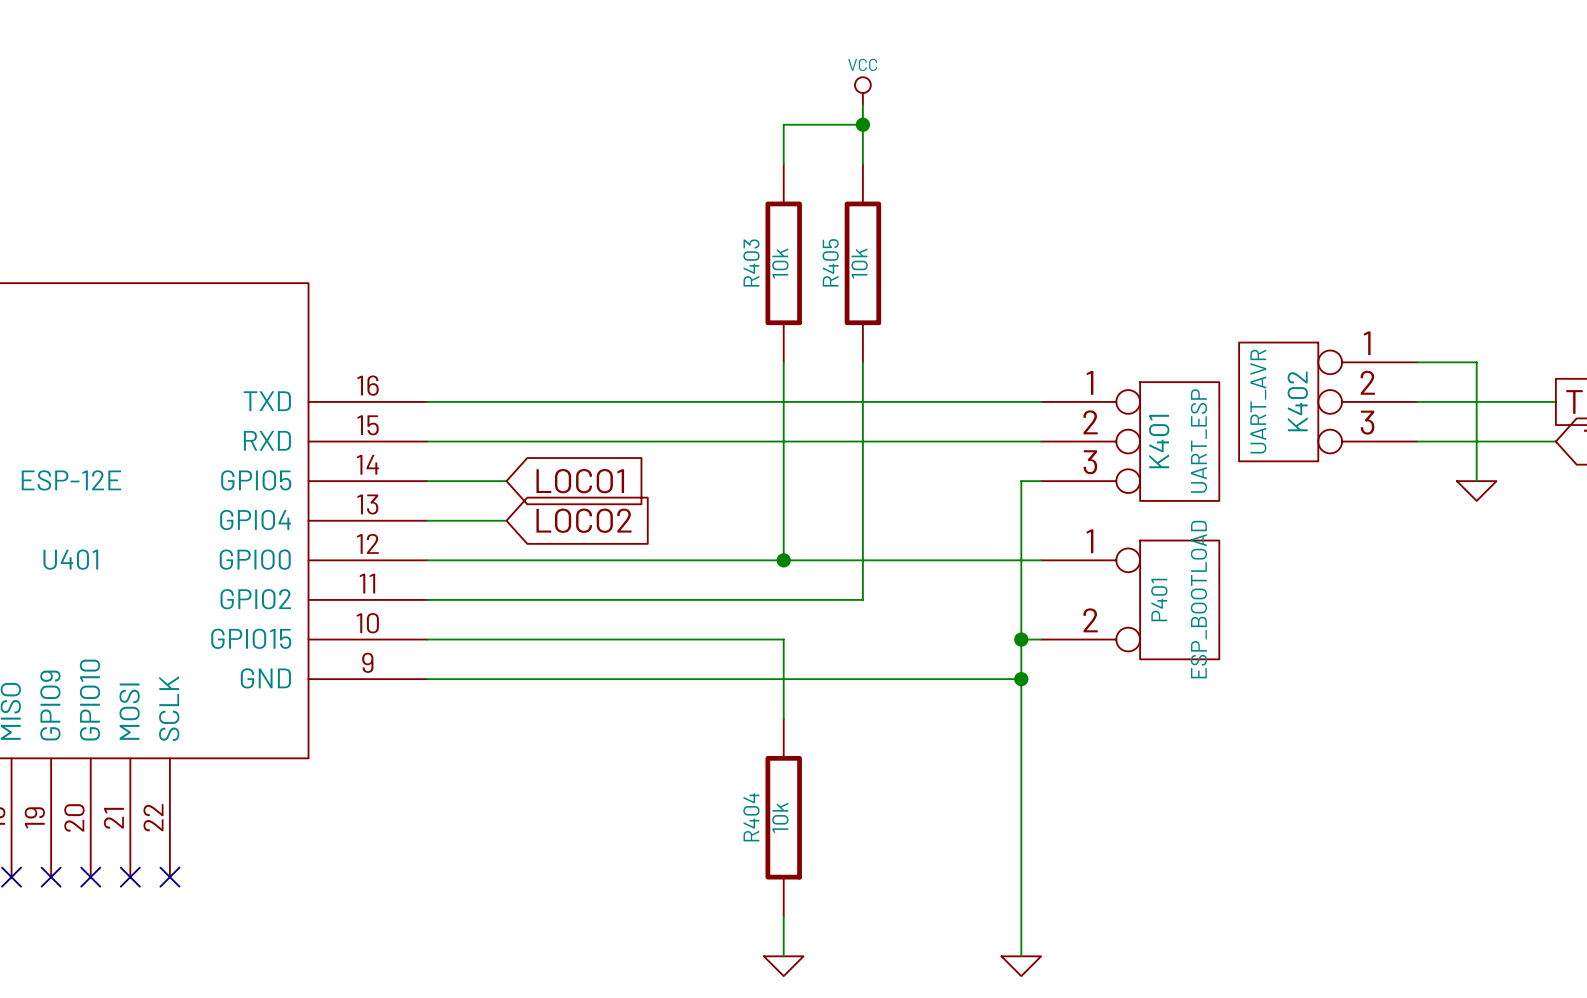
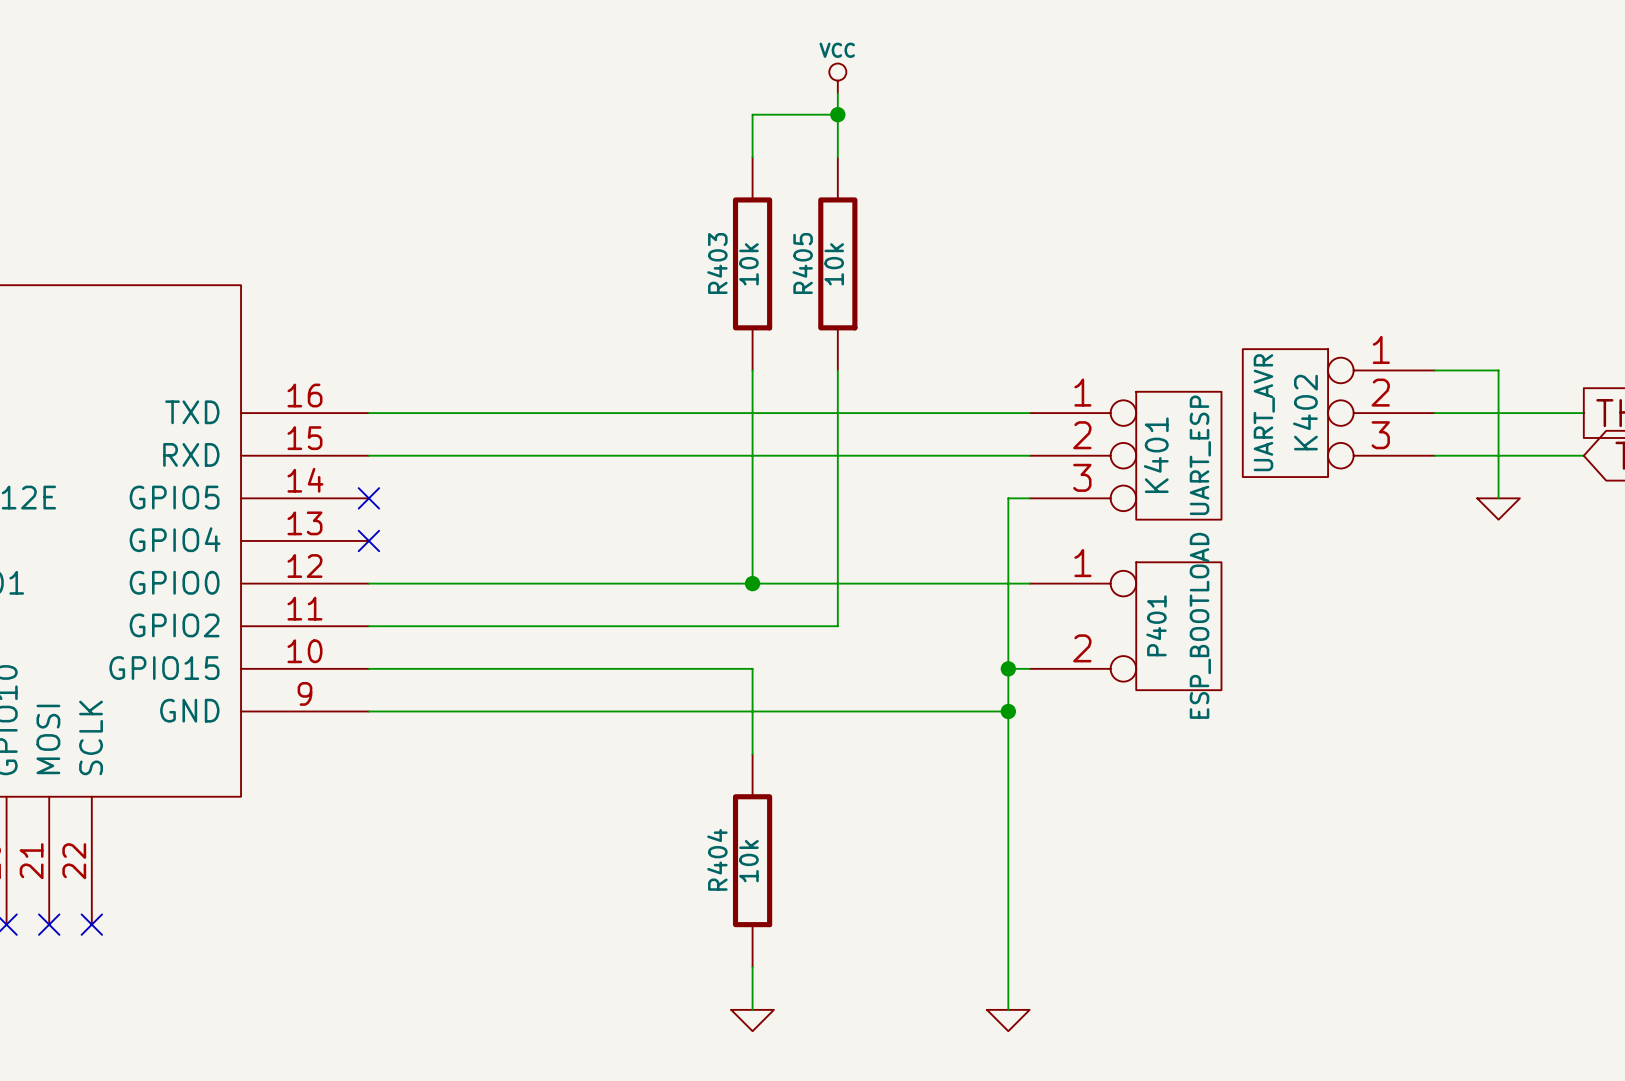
wire: (427, 481) (506, 481) -> none
no-connect mark: none -> (368, 498)
global label: LOCO1 (580, 481) -> none
wire: (427, 520) (506, 520) -> none
no-connect mark: none -> (368, 540)
global label: LOCO2 (584, 520) -> none

